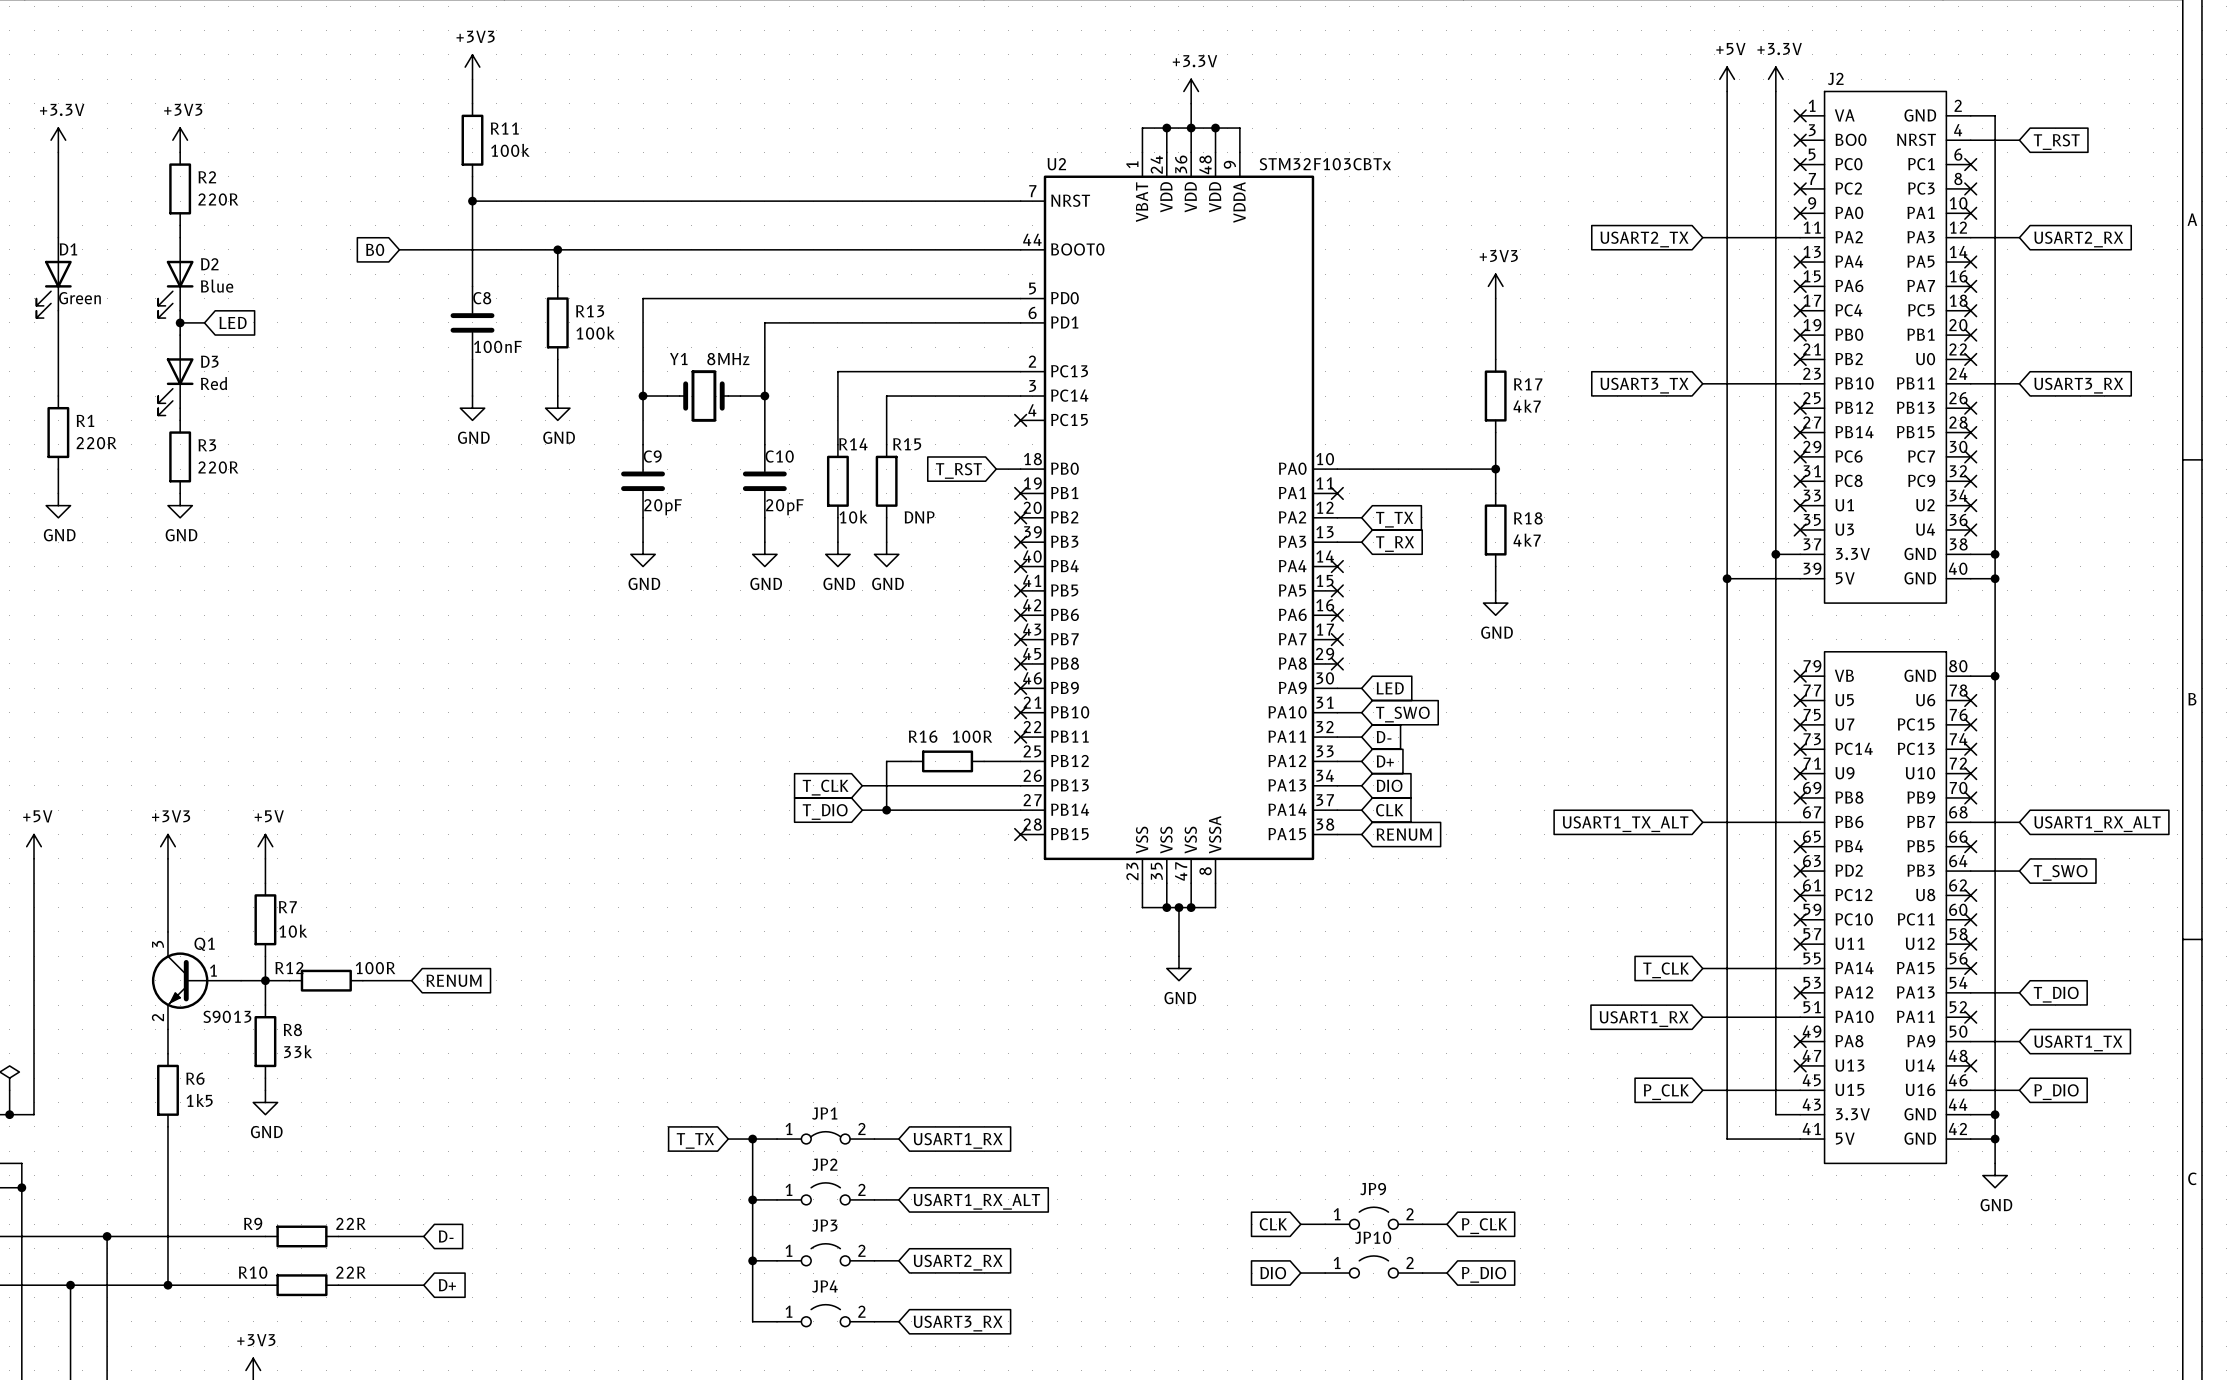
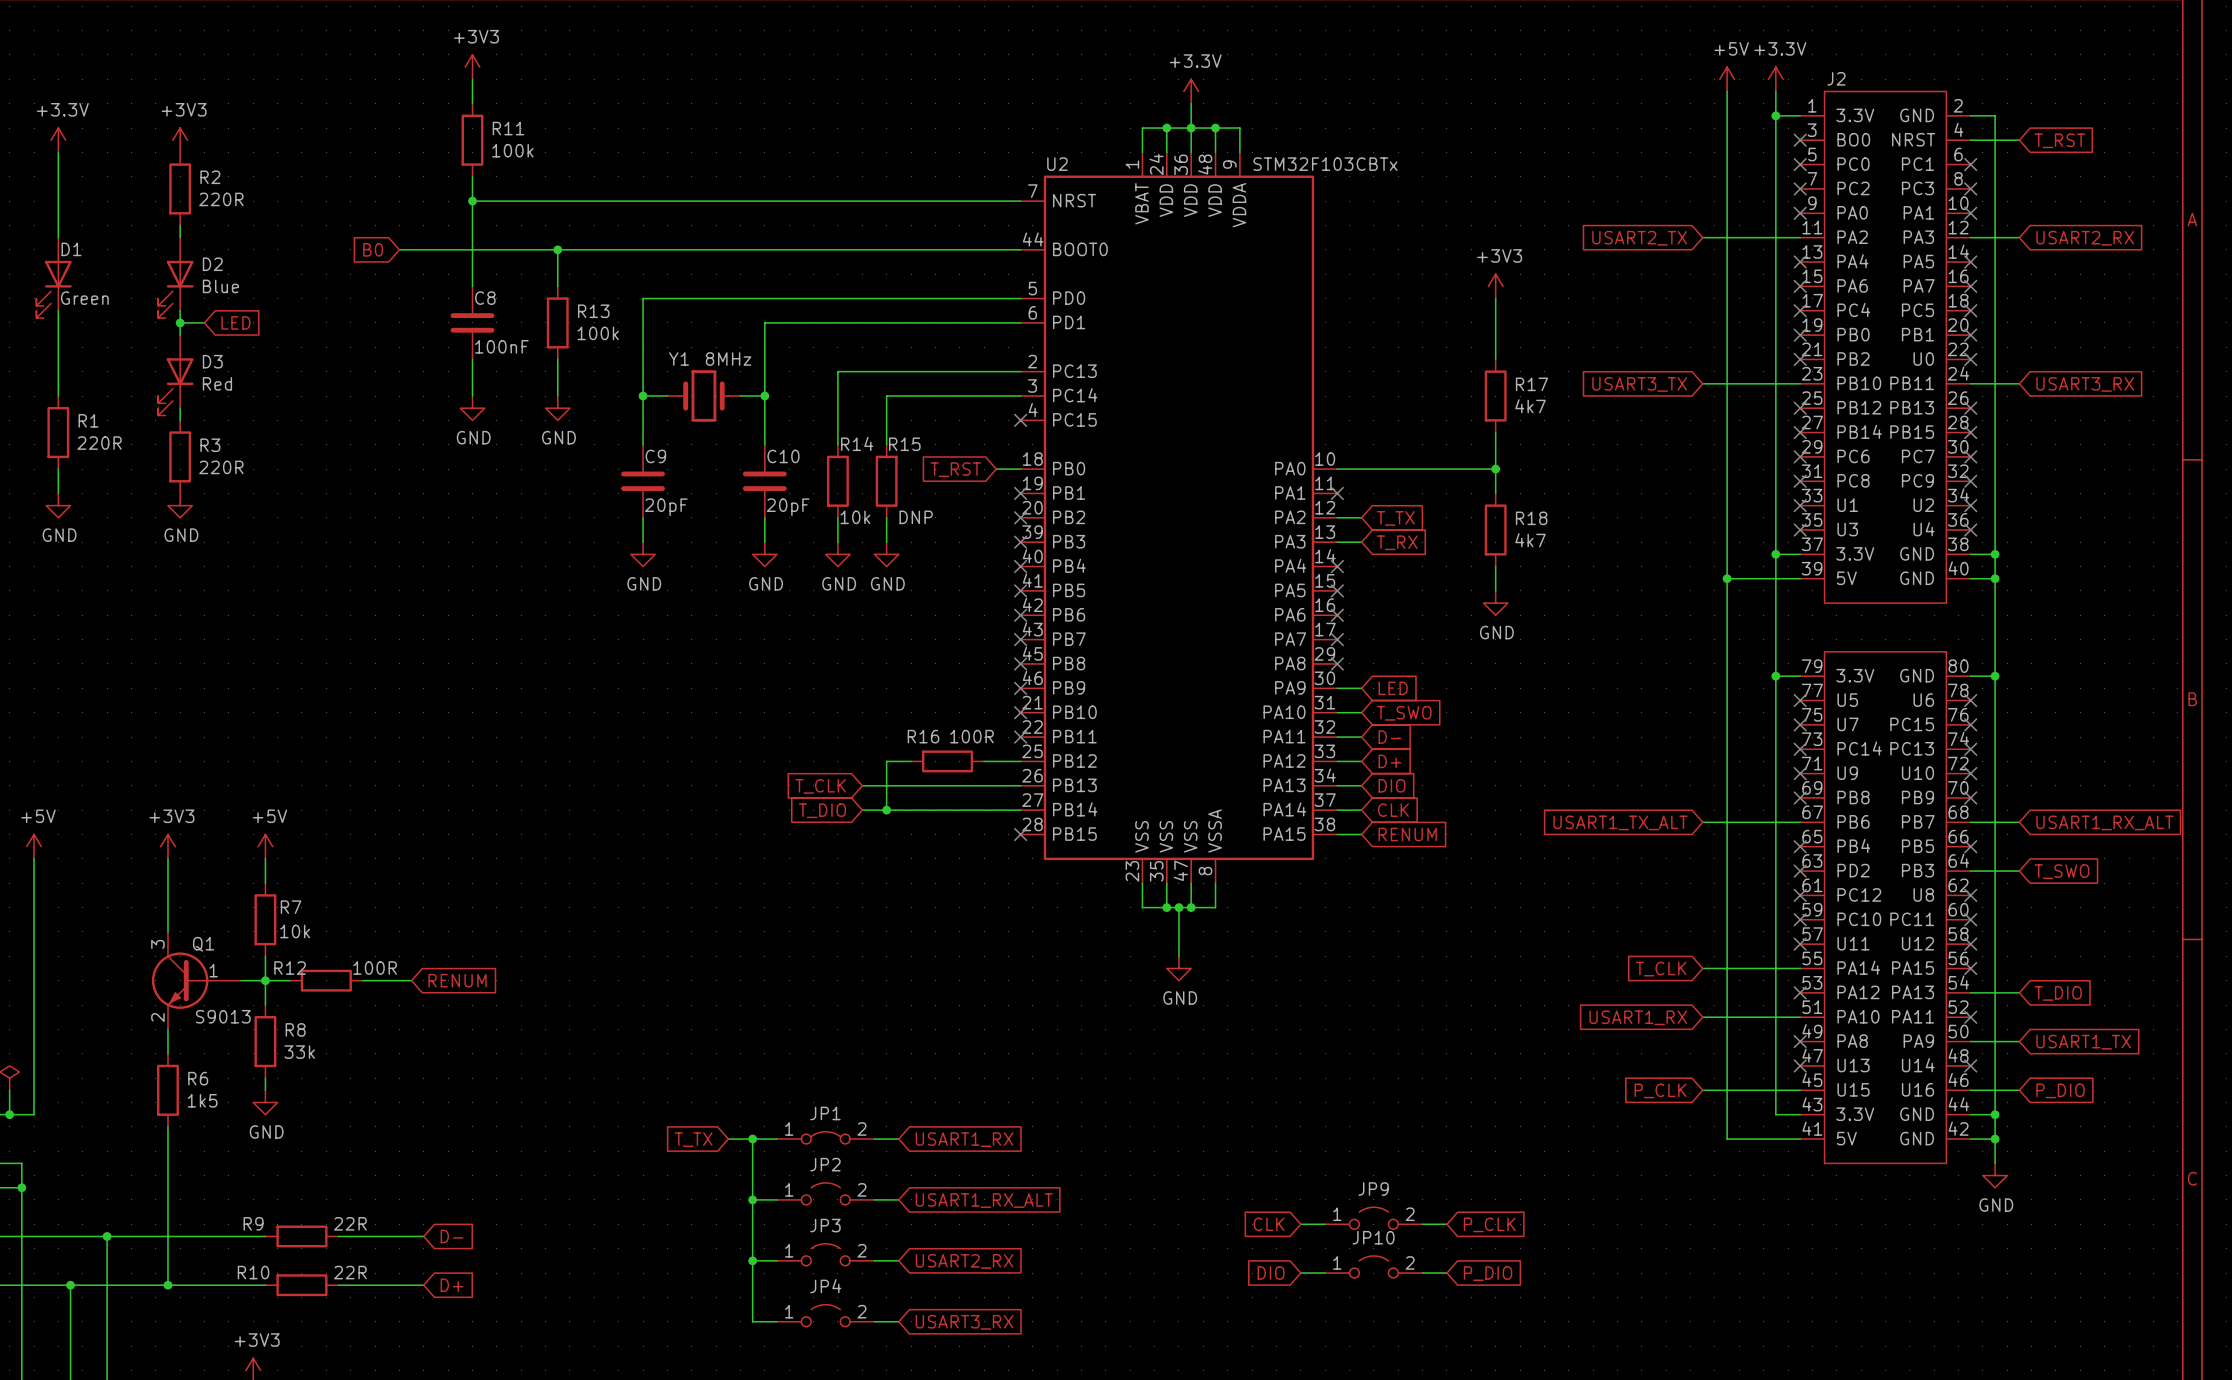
wire: none -> (1775, 115) (1800, 115)
junction: none -> (1775, 115)
no-connect mark: (1800, 115) -> none
J2 pin name: VA (1844, 115) -> 3.3V (1855, 115)
J2 pin name: VB (1844, 675) -> 3.3V (1855, 675)
wire: none -> (1775, 676) (1800, 676)
junction: none -> (1775, 676)
no-connect mark: (1800, 676) -> none

